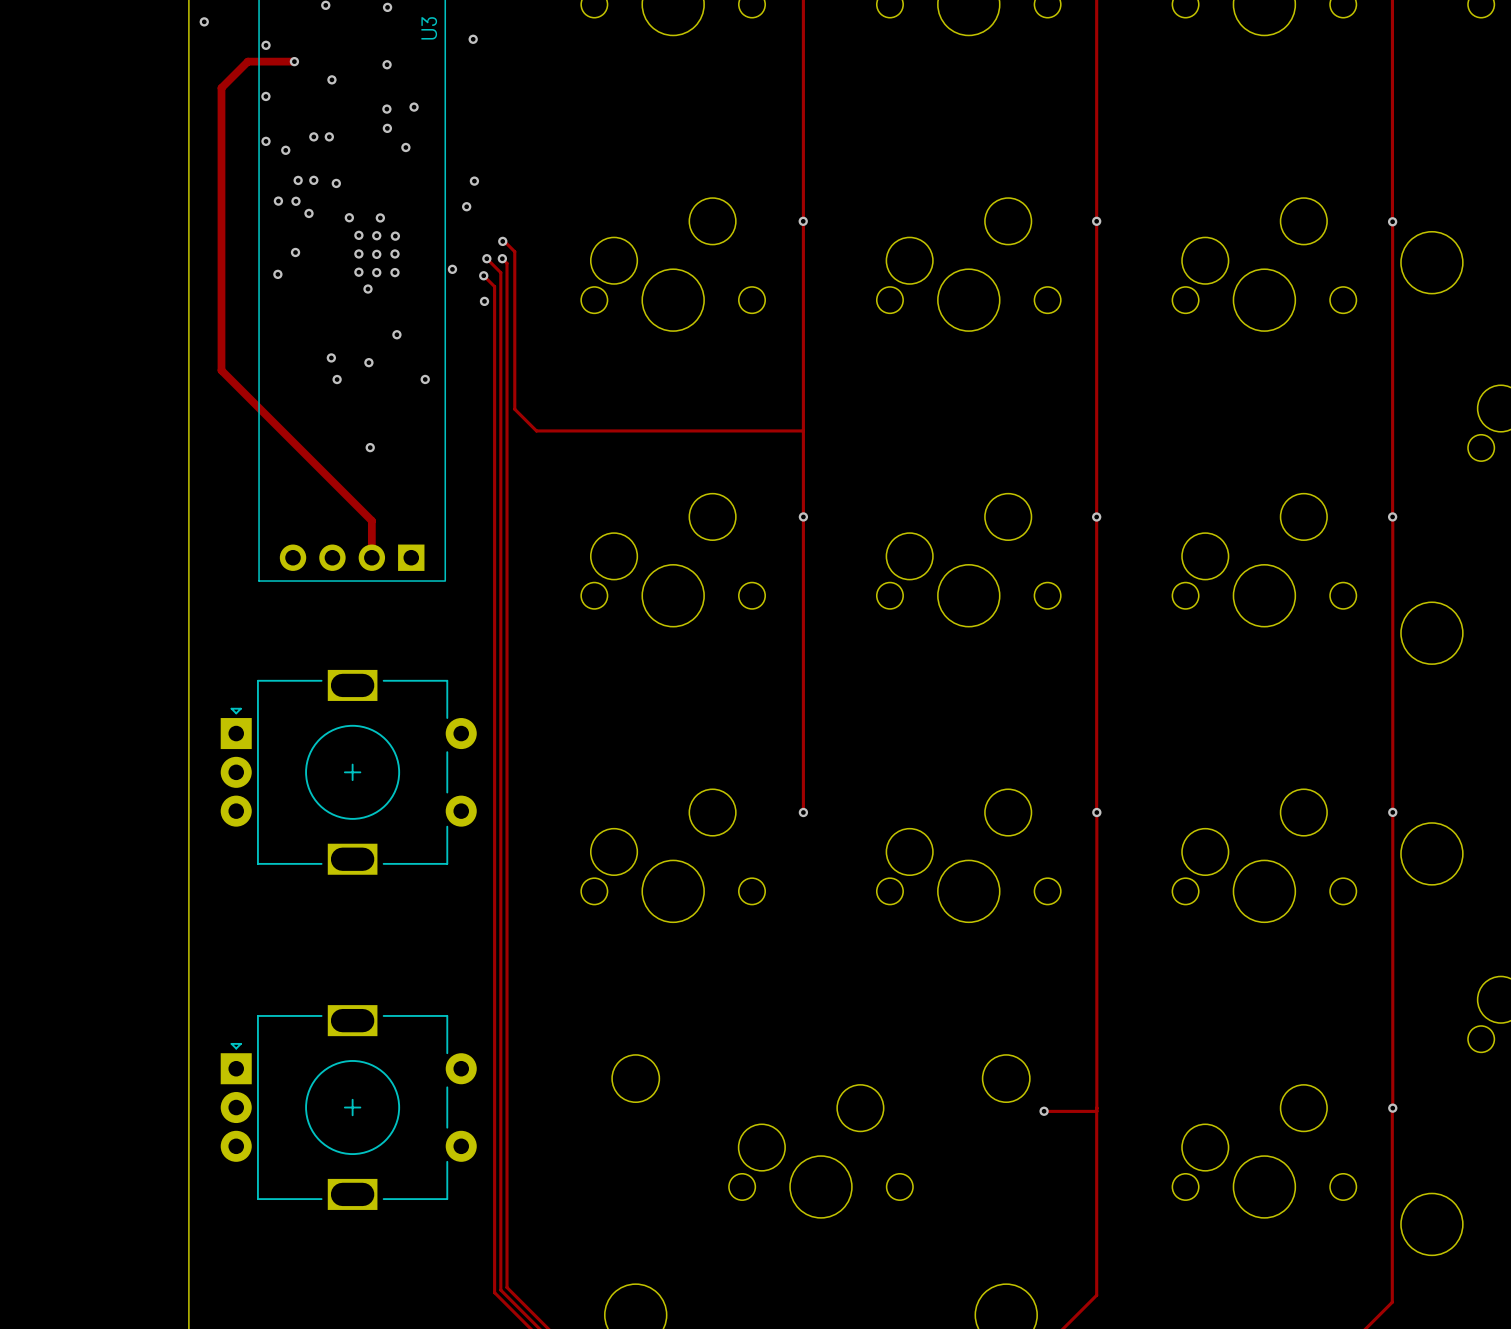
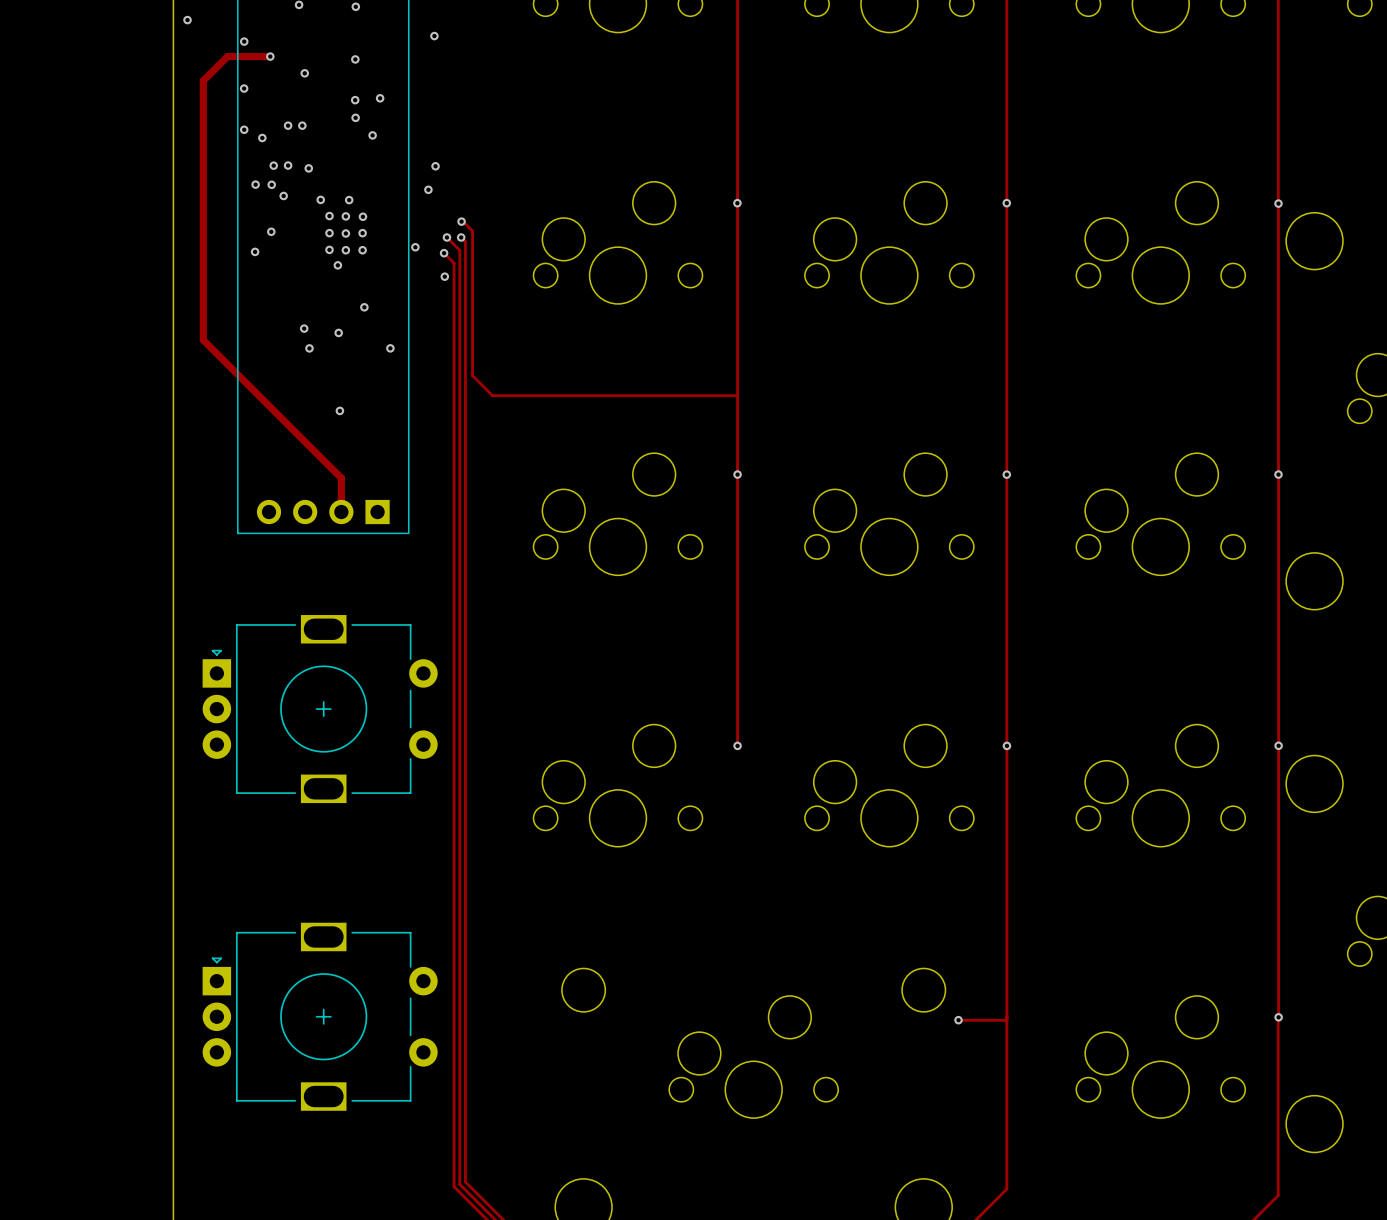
U3 name: U3 (429, 28) -> none

